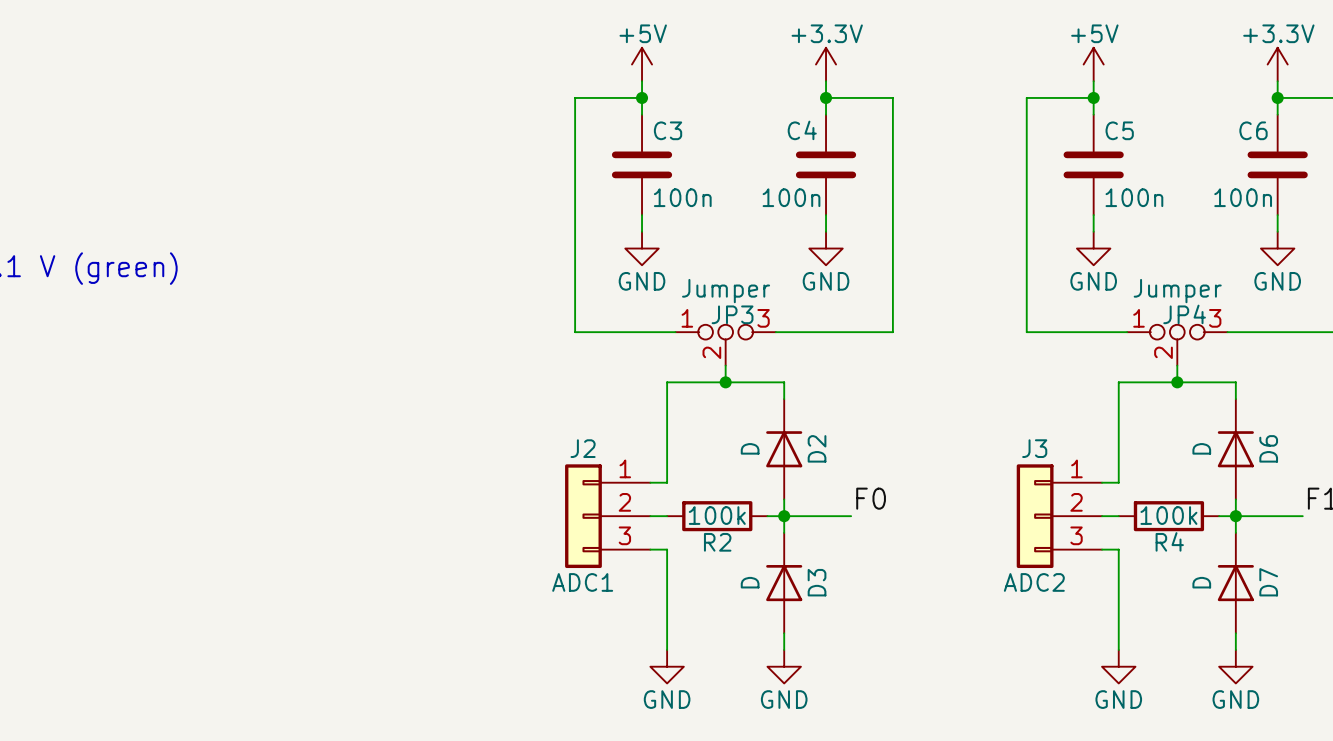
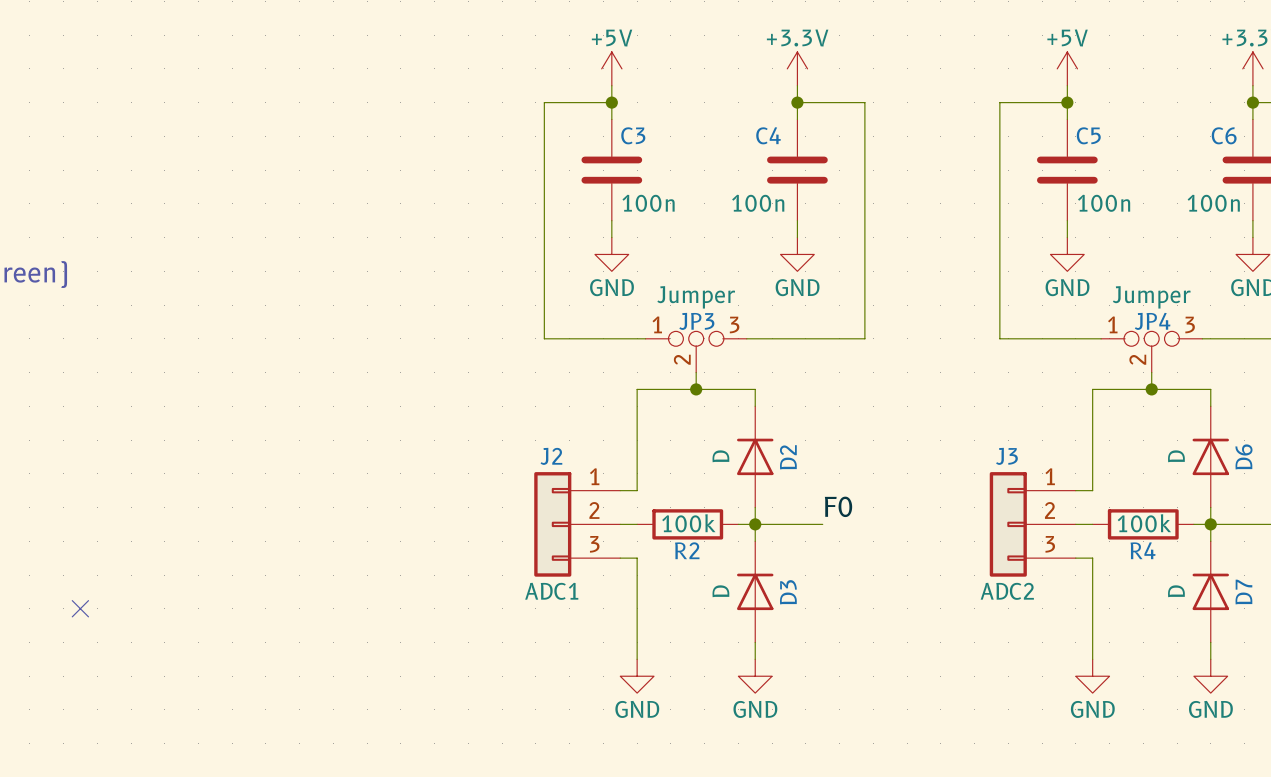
no-connect mark: none -> (80, 608)

